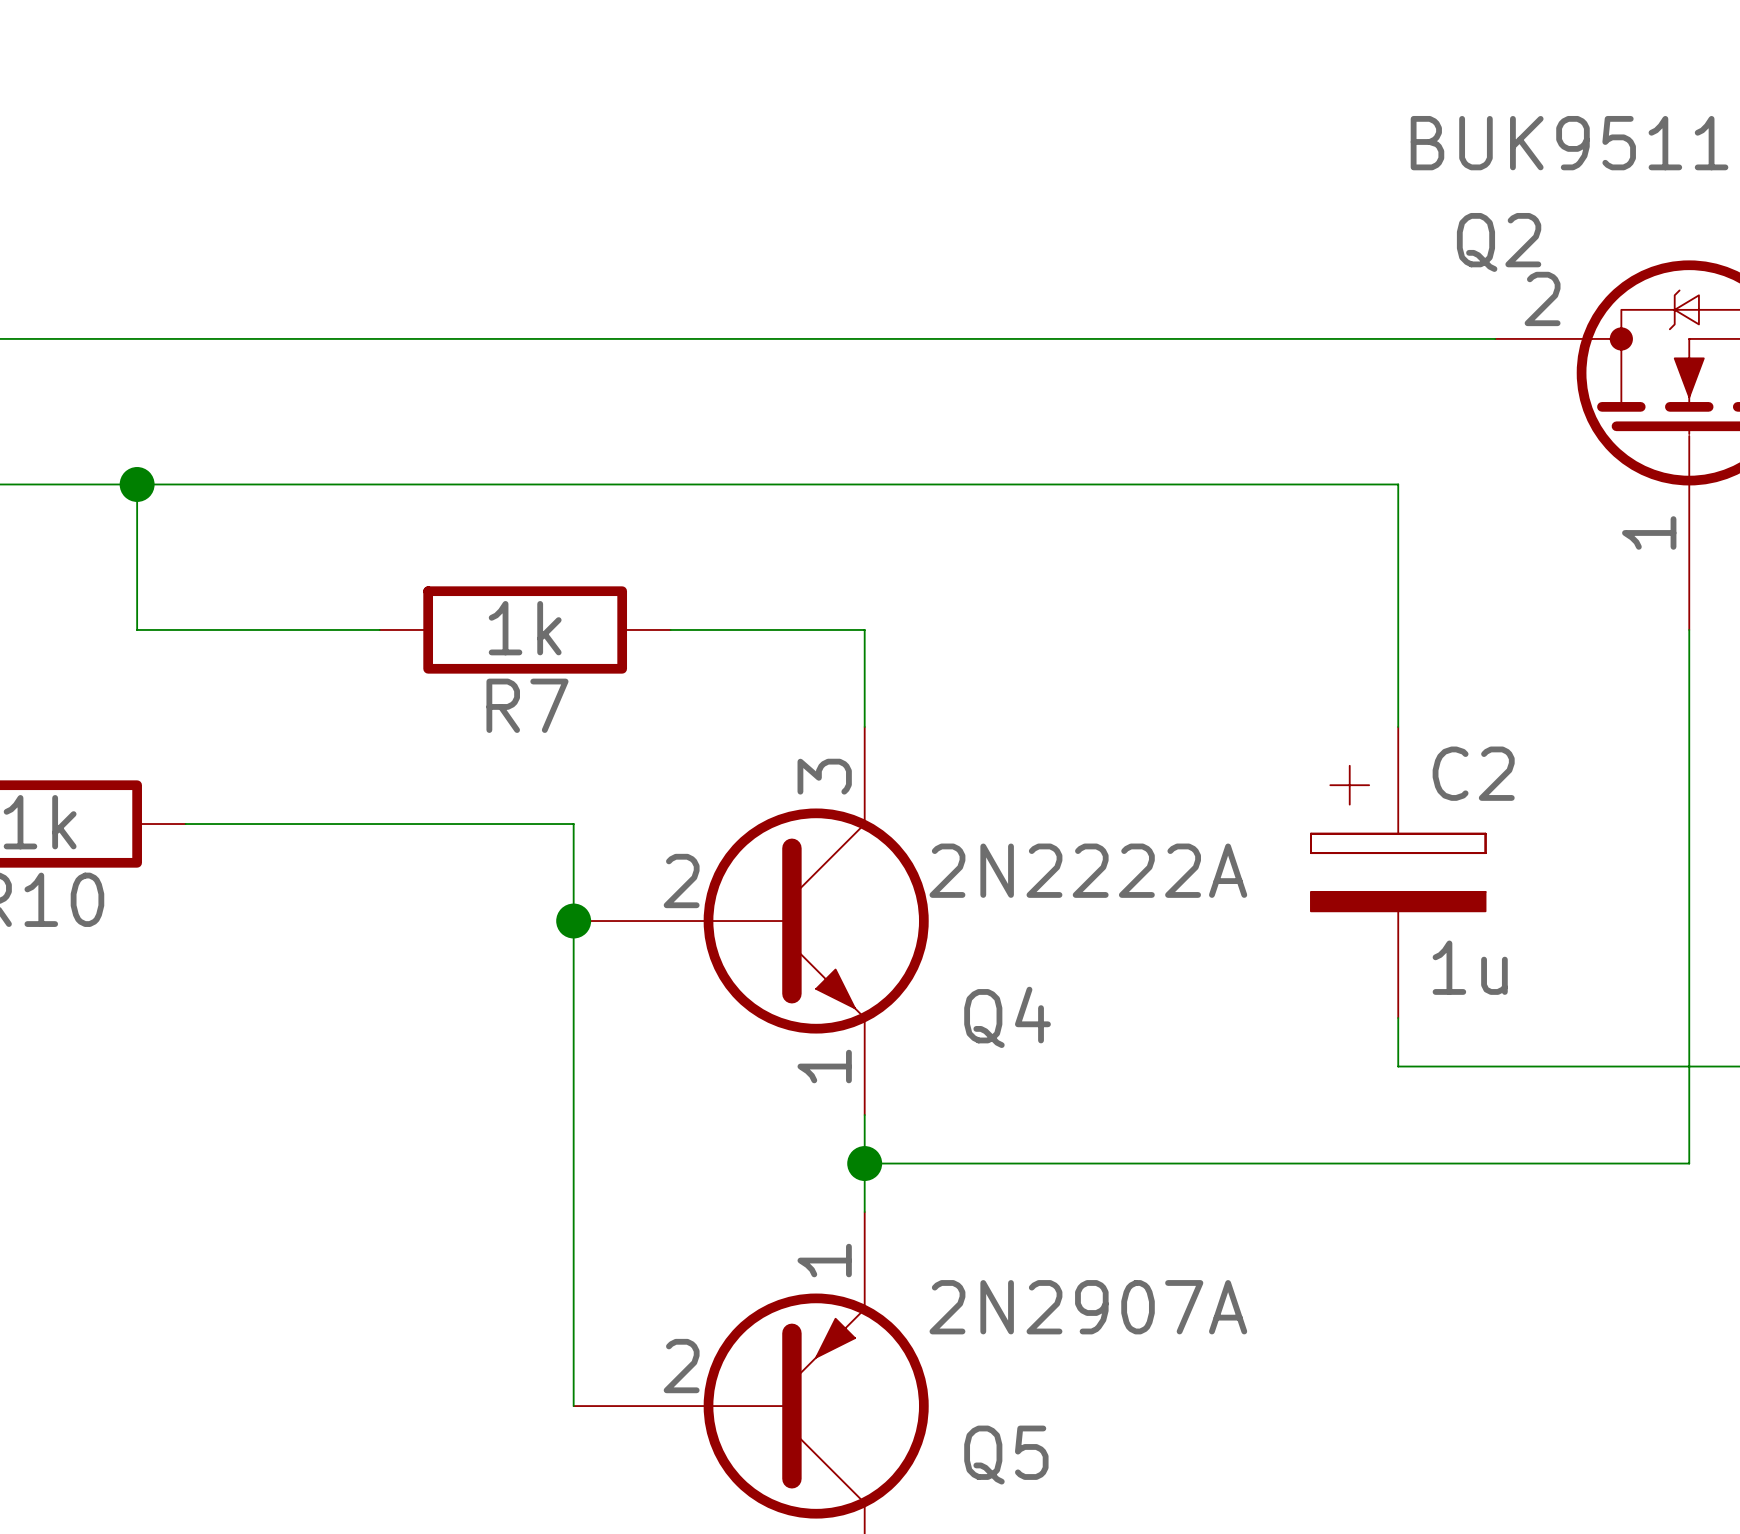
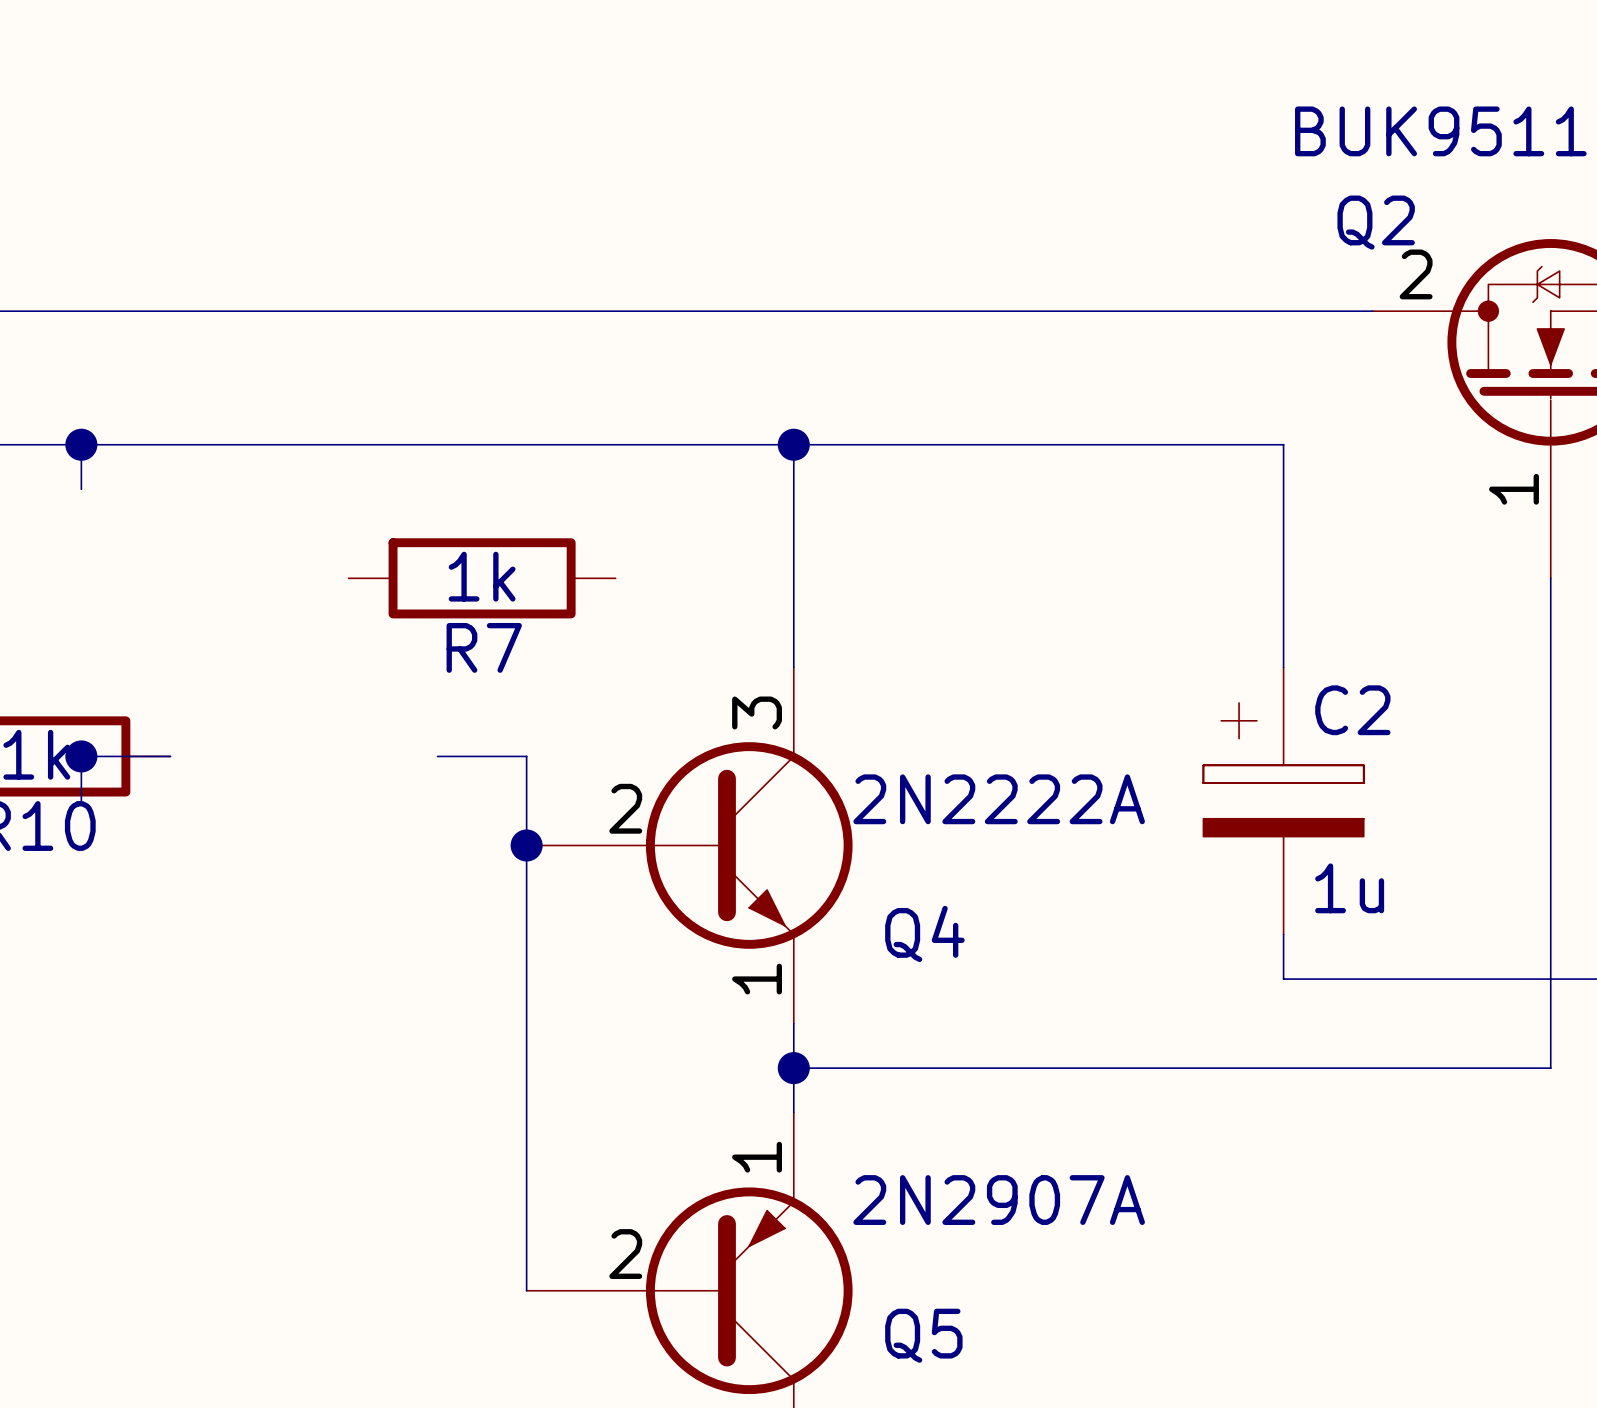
wire: none -> (81, 444) (81, 489)
wire: (137, 484) (137, 629) (379, 629) -> none
junction position: (137, 484) -> (81, 444)
junction: none -> (793, 444)
wire: (670, 629) (864, 629) -> (793, 444) (793, 578)
junction: none -> (81, 756)
wire: (185, 824) (476, 824) -> (170, 756) (81, 756) (81, 800)

